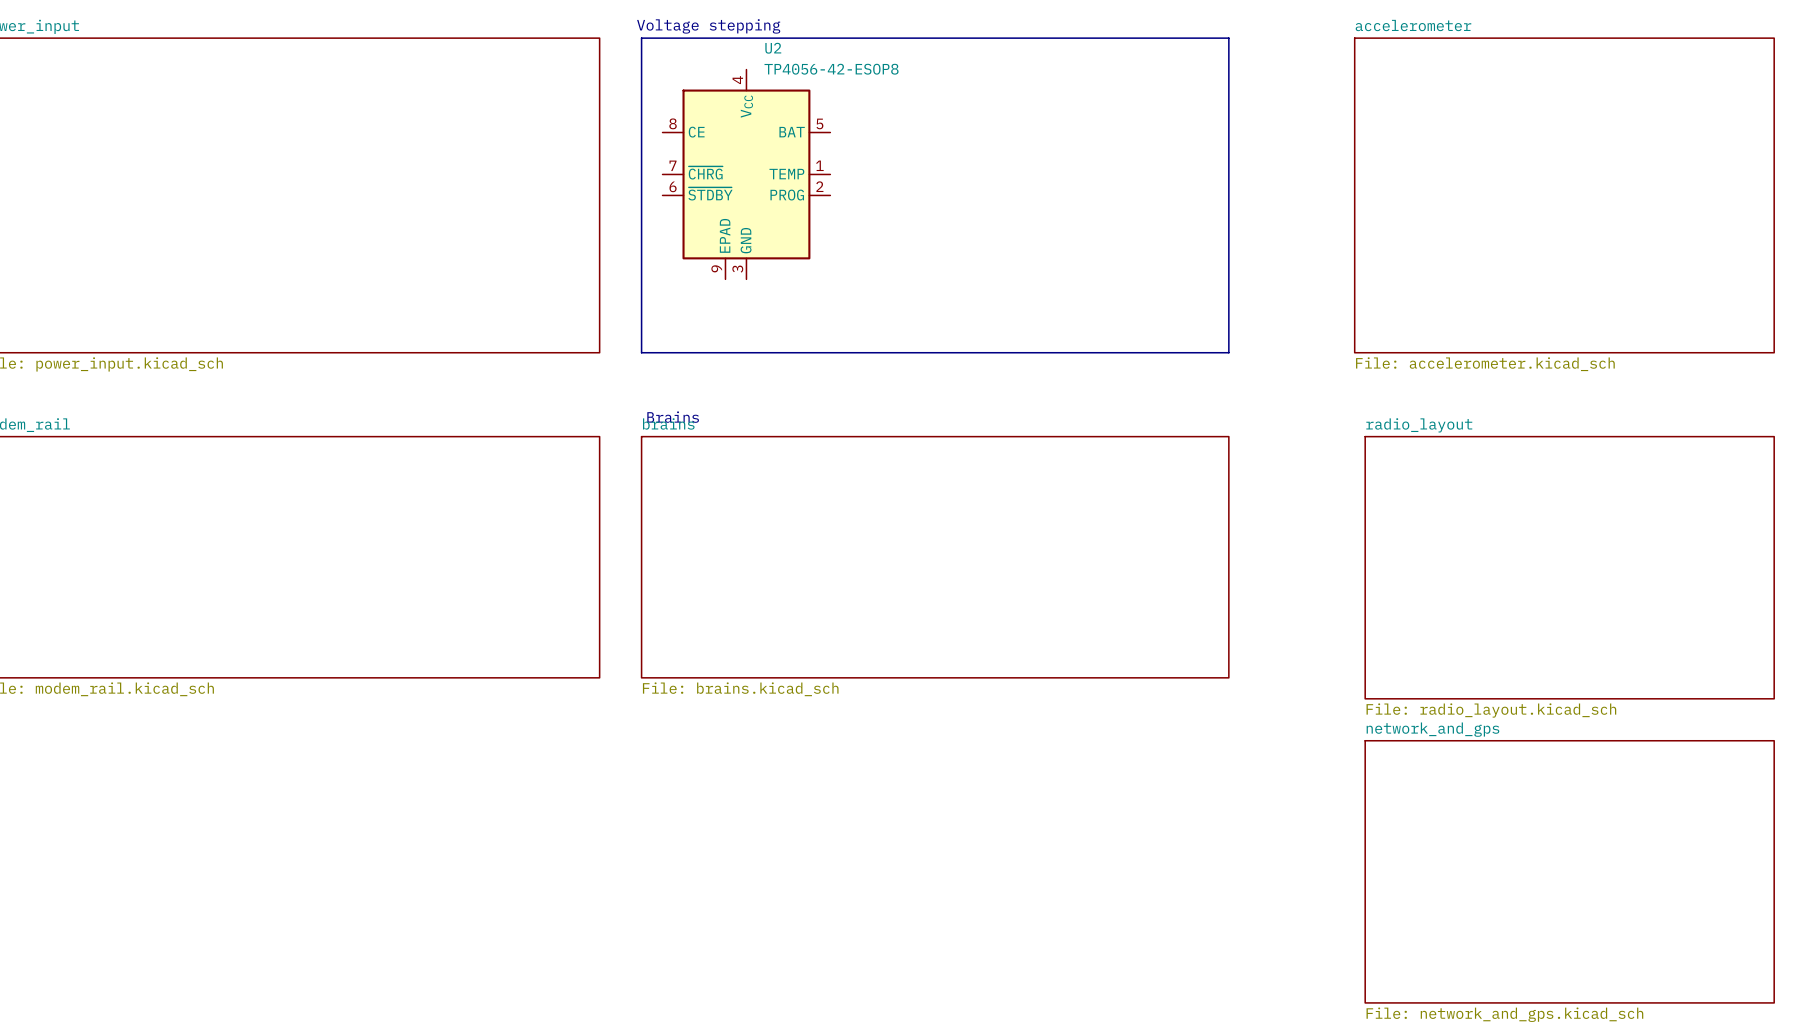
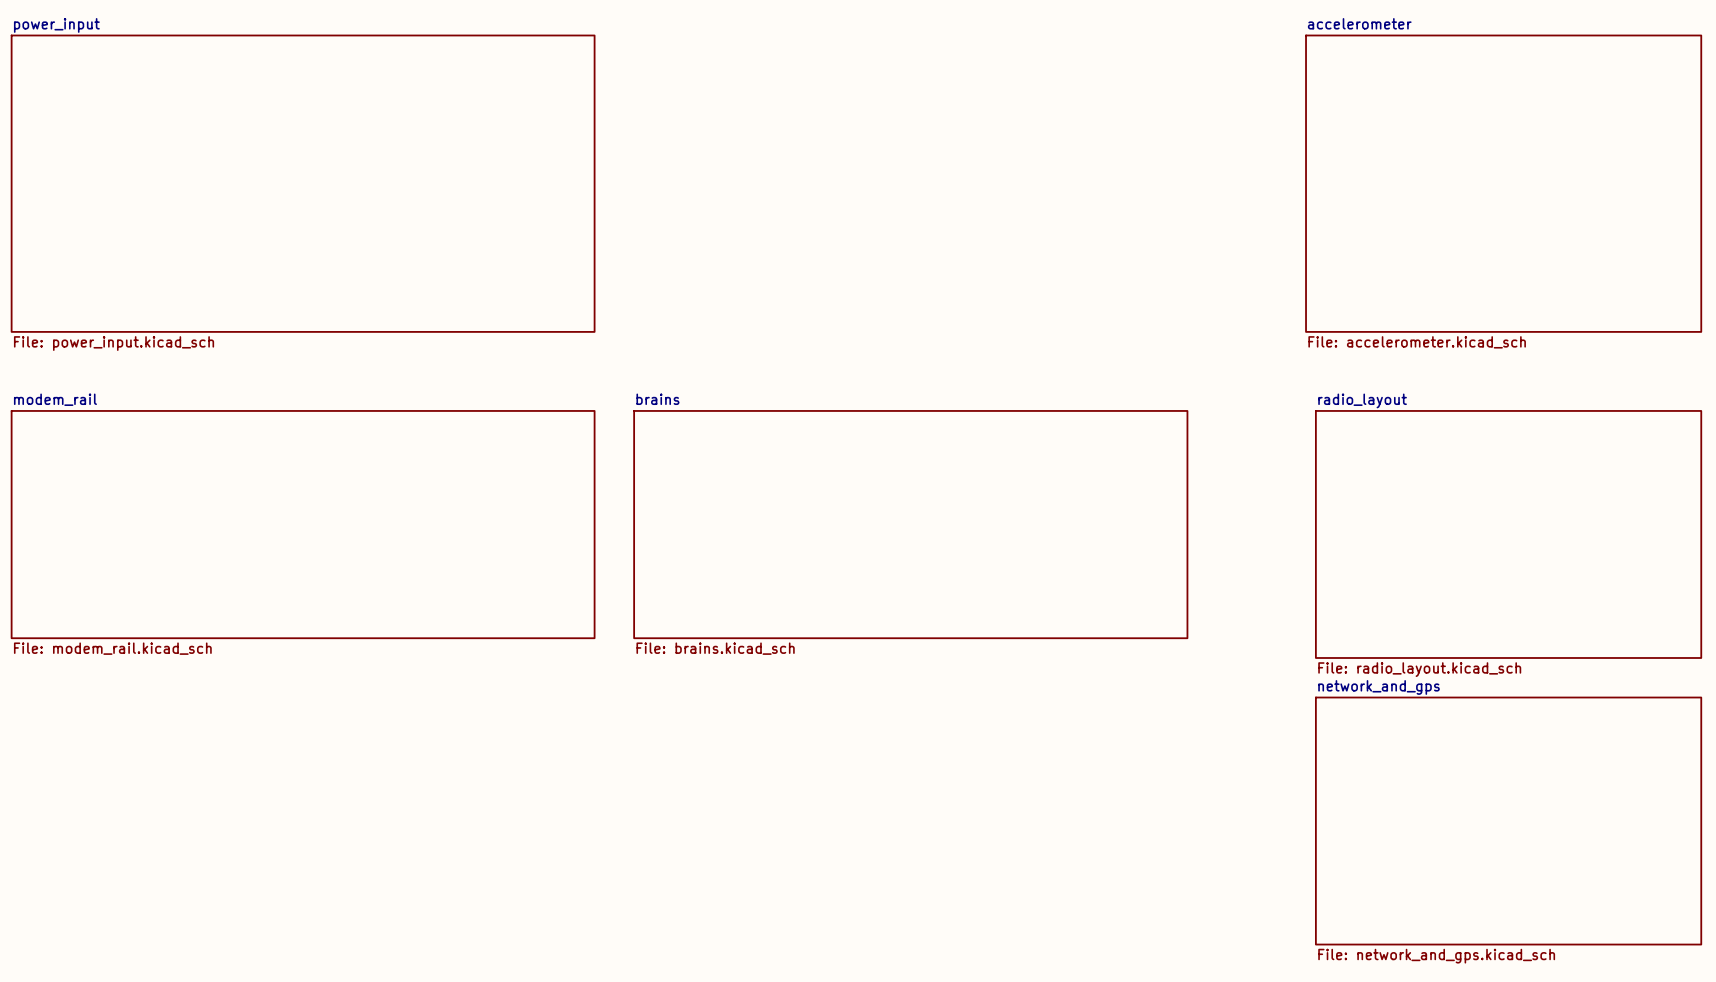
text: Voltage stepping (708, 26) -> none
line: (641, 38) (1228, 38) (1228, 352) (641, 352) (641, 38) -> none
U2: TP4056-42-ESOP8 (746, 174) -> none
text: Brains (673, 417) -> none

